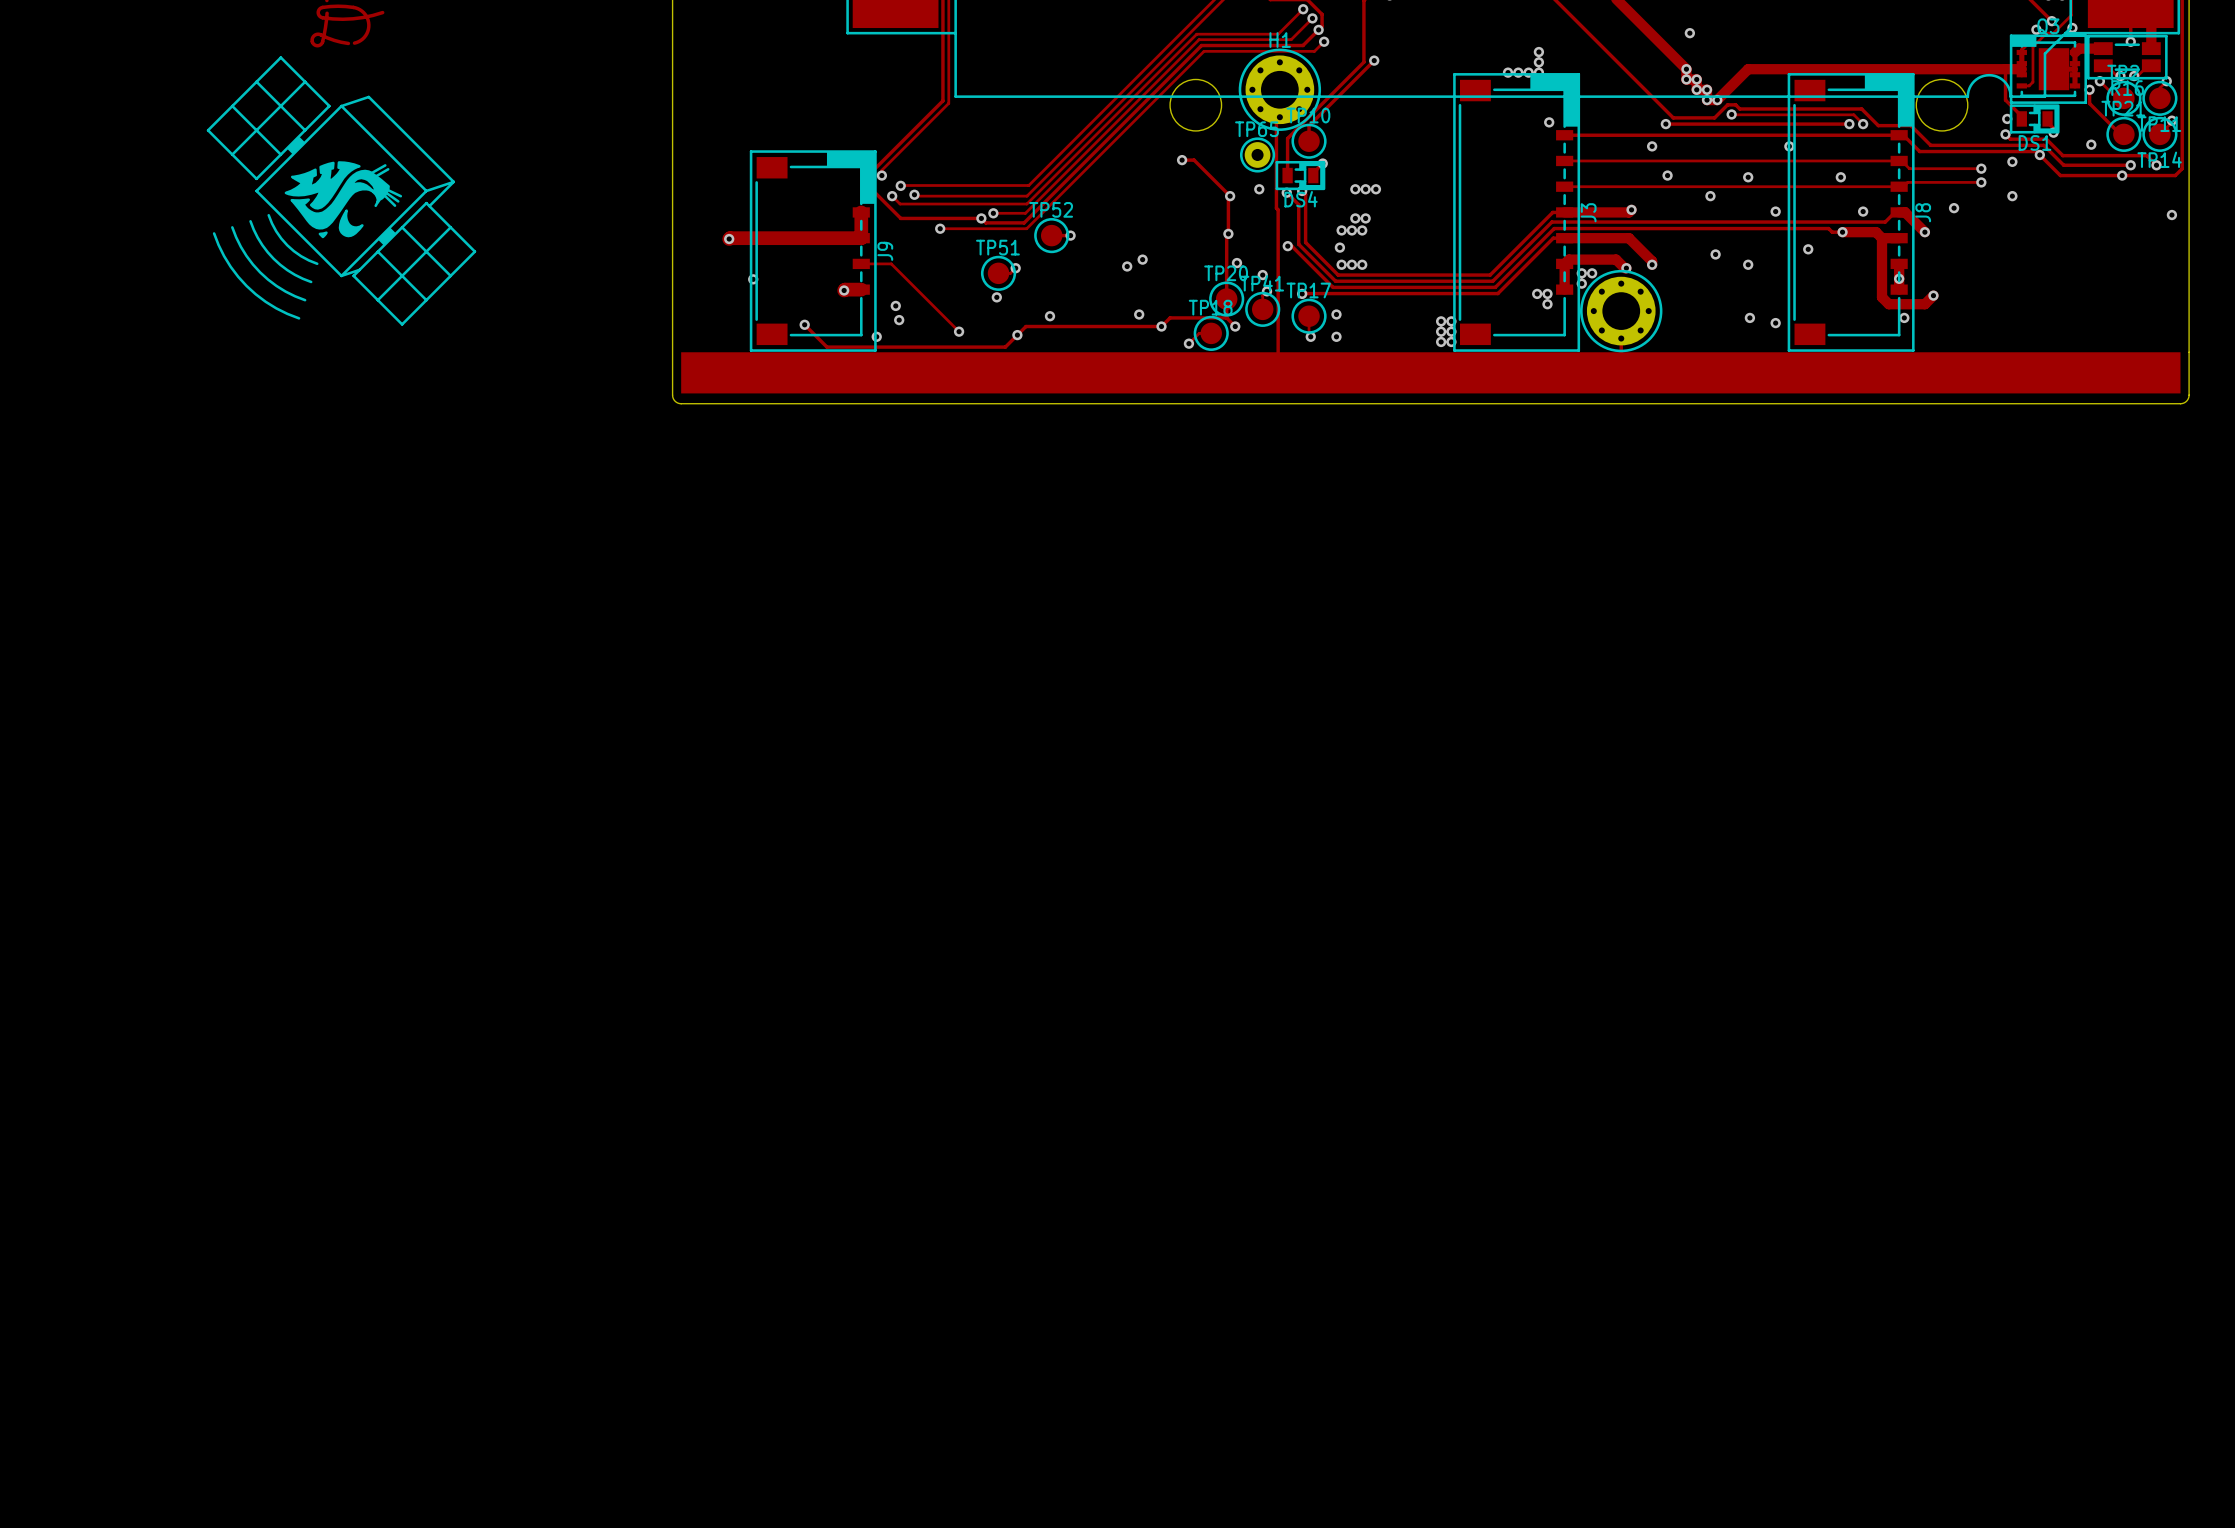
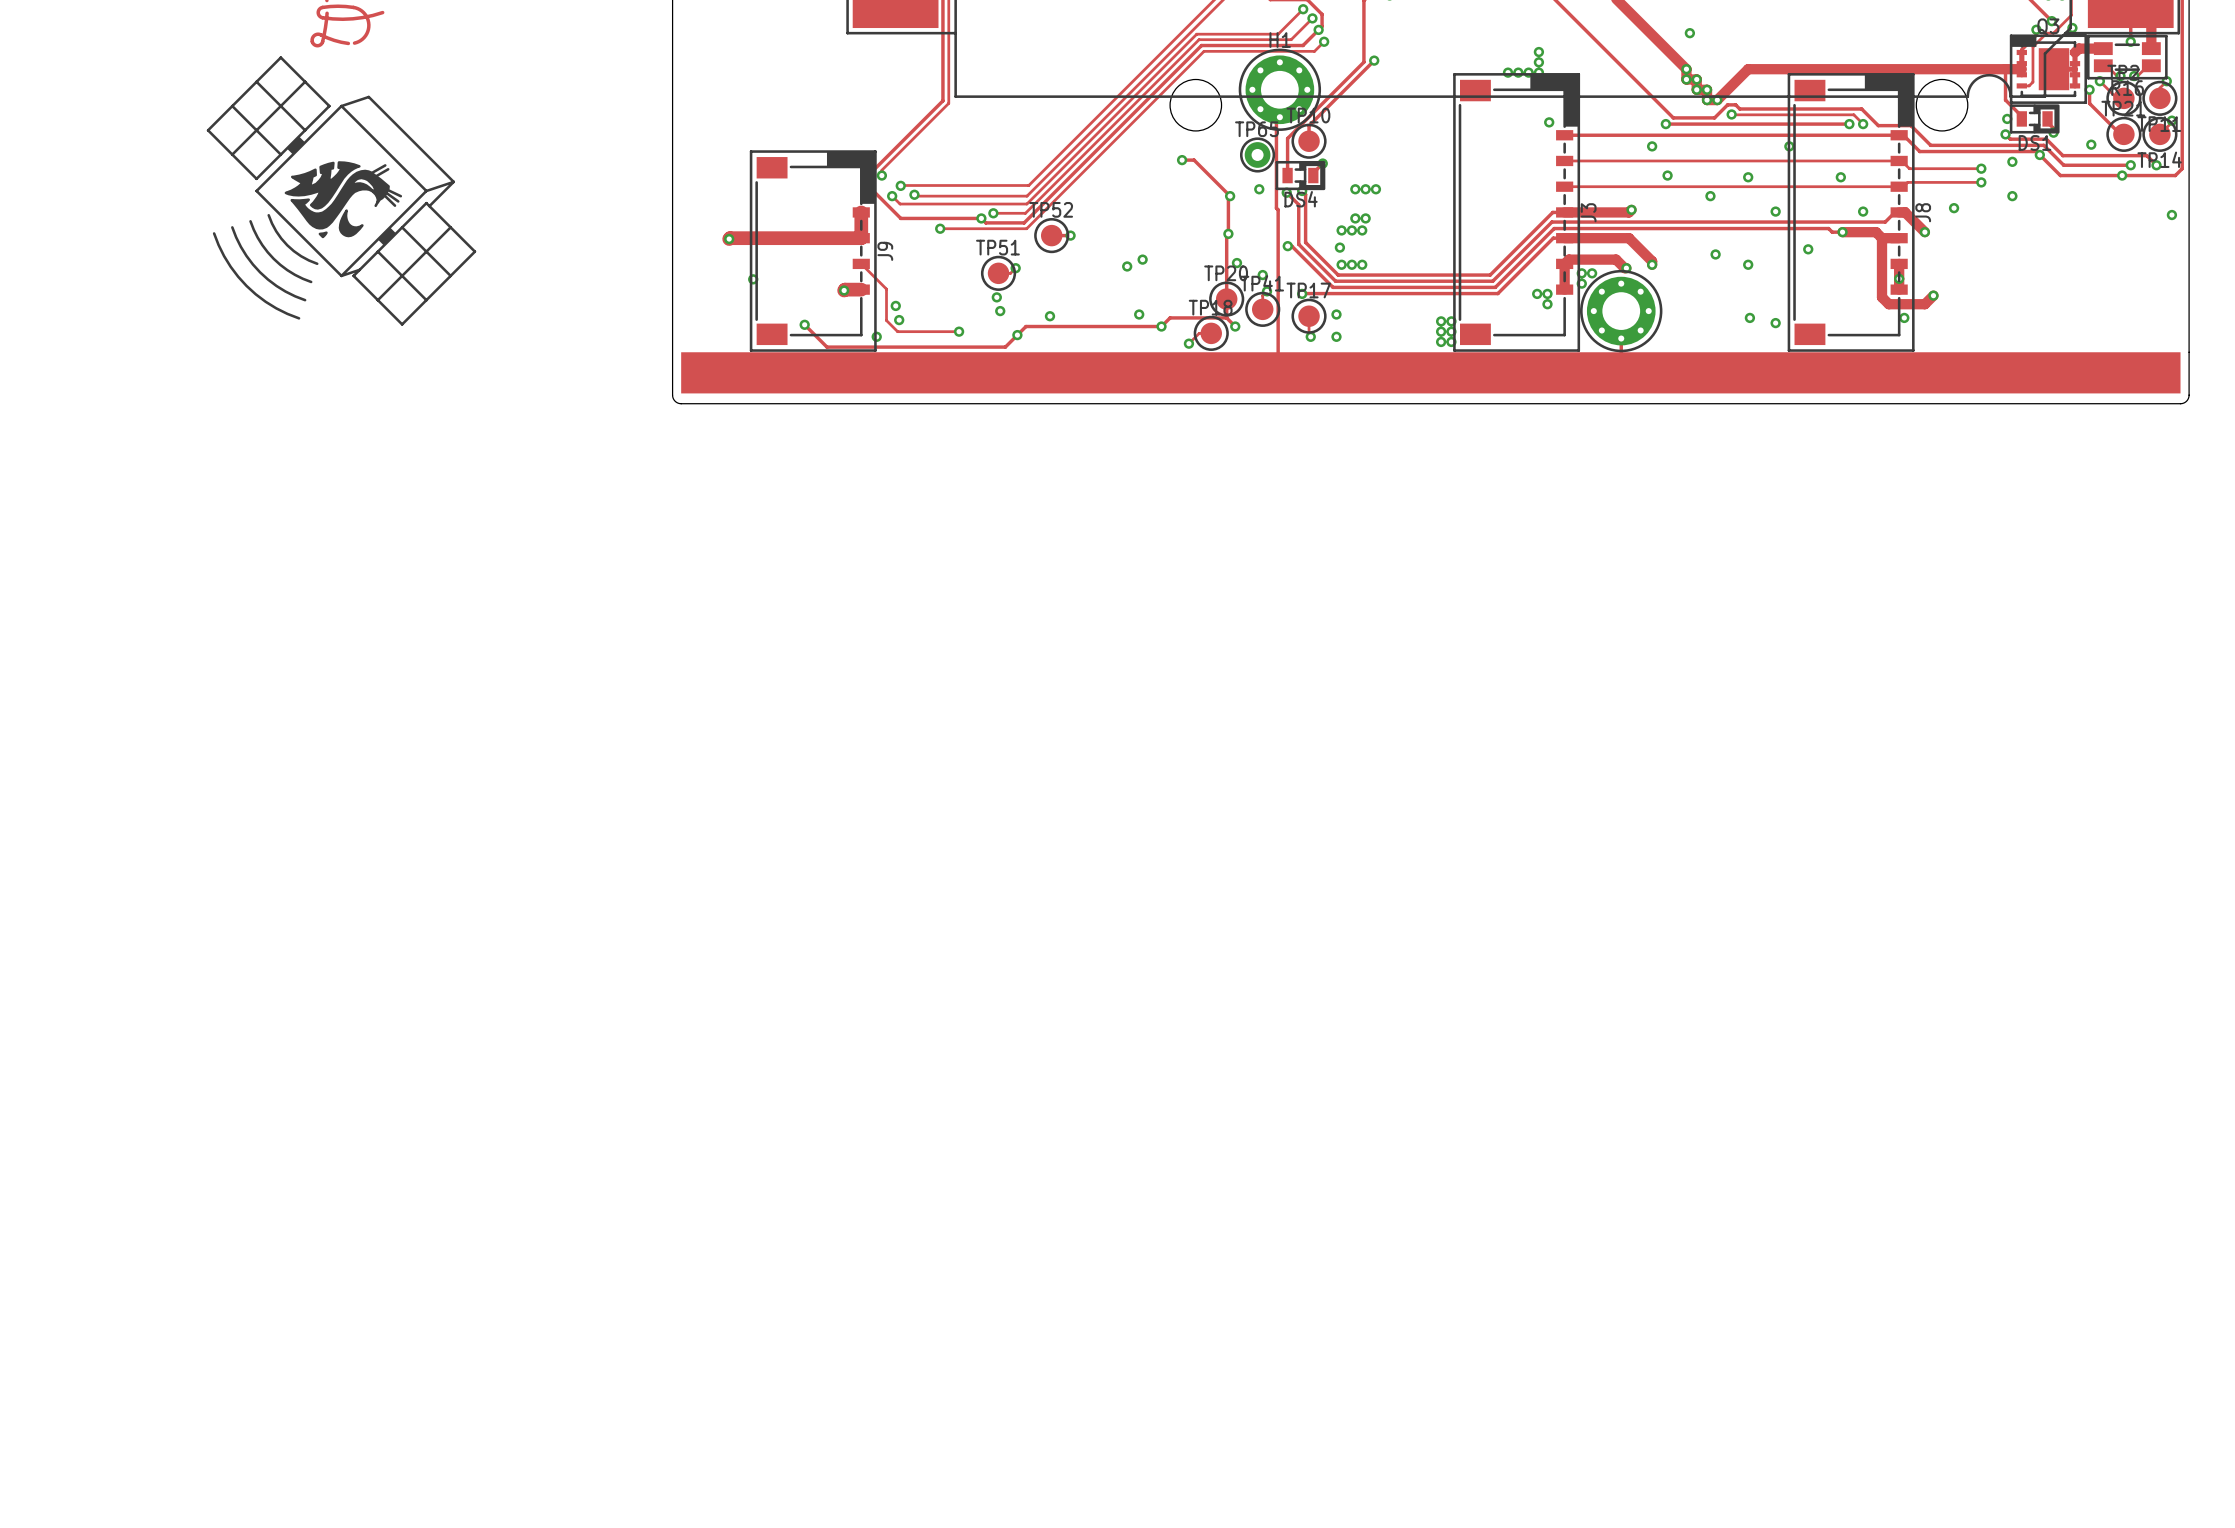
track: (861, 263) (891, 263) (959, 331) -> (861, 263) (886, 289) (886, 320) (897, 331) (959, 331)
via: none -> (1000, 311)

